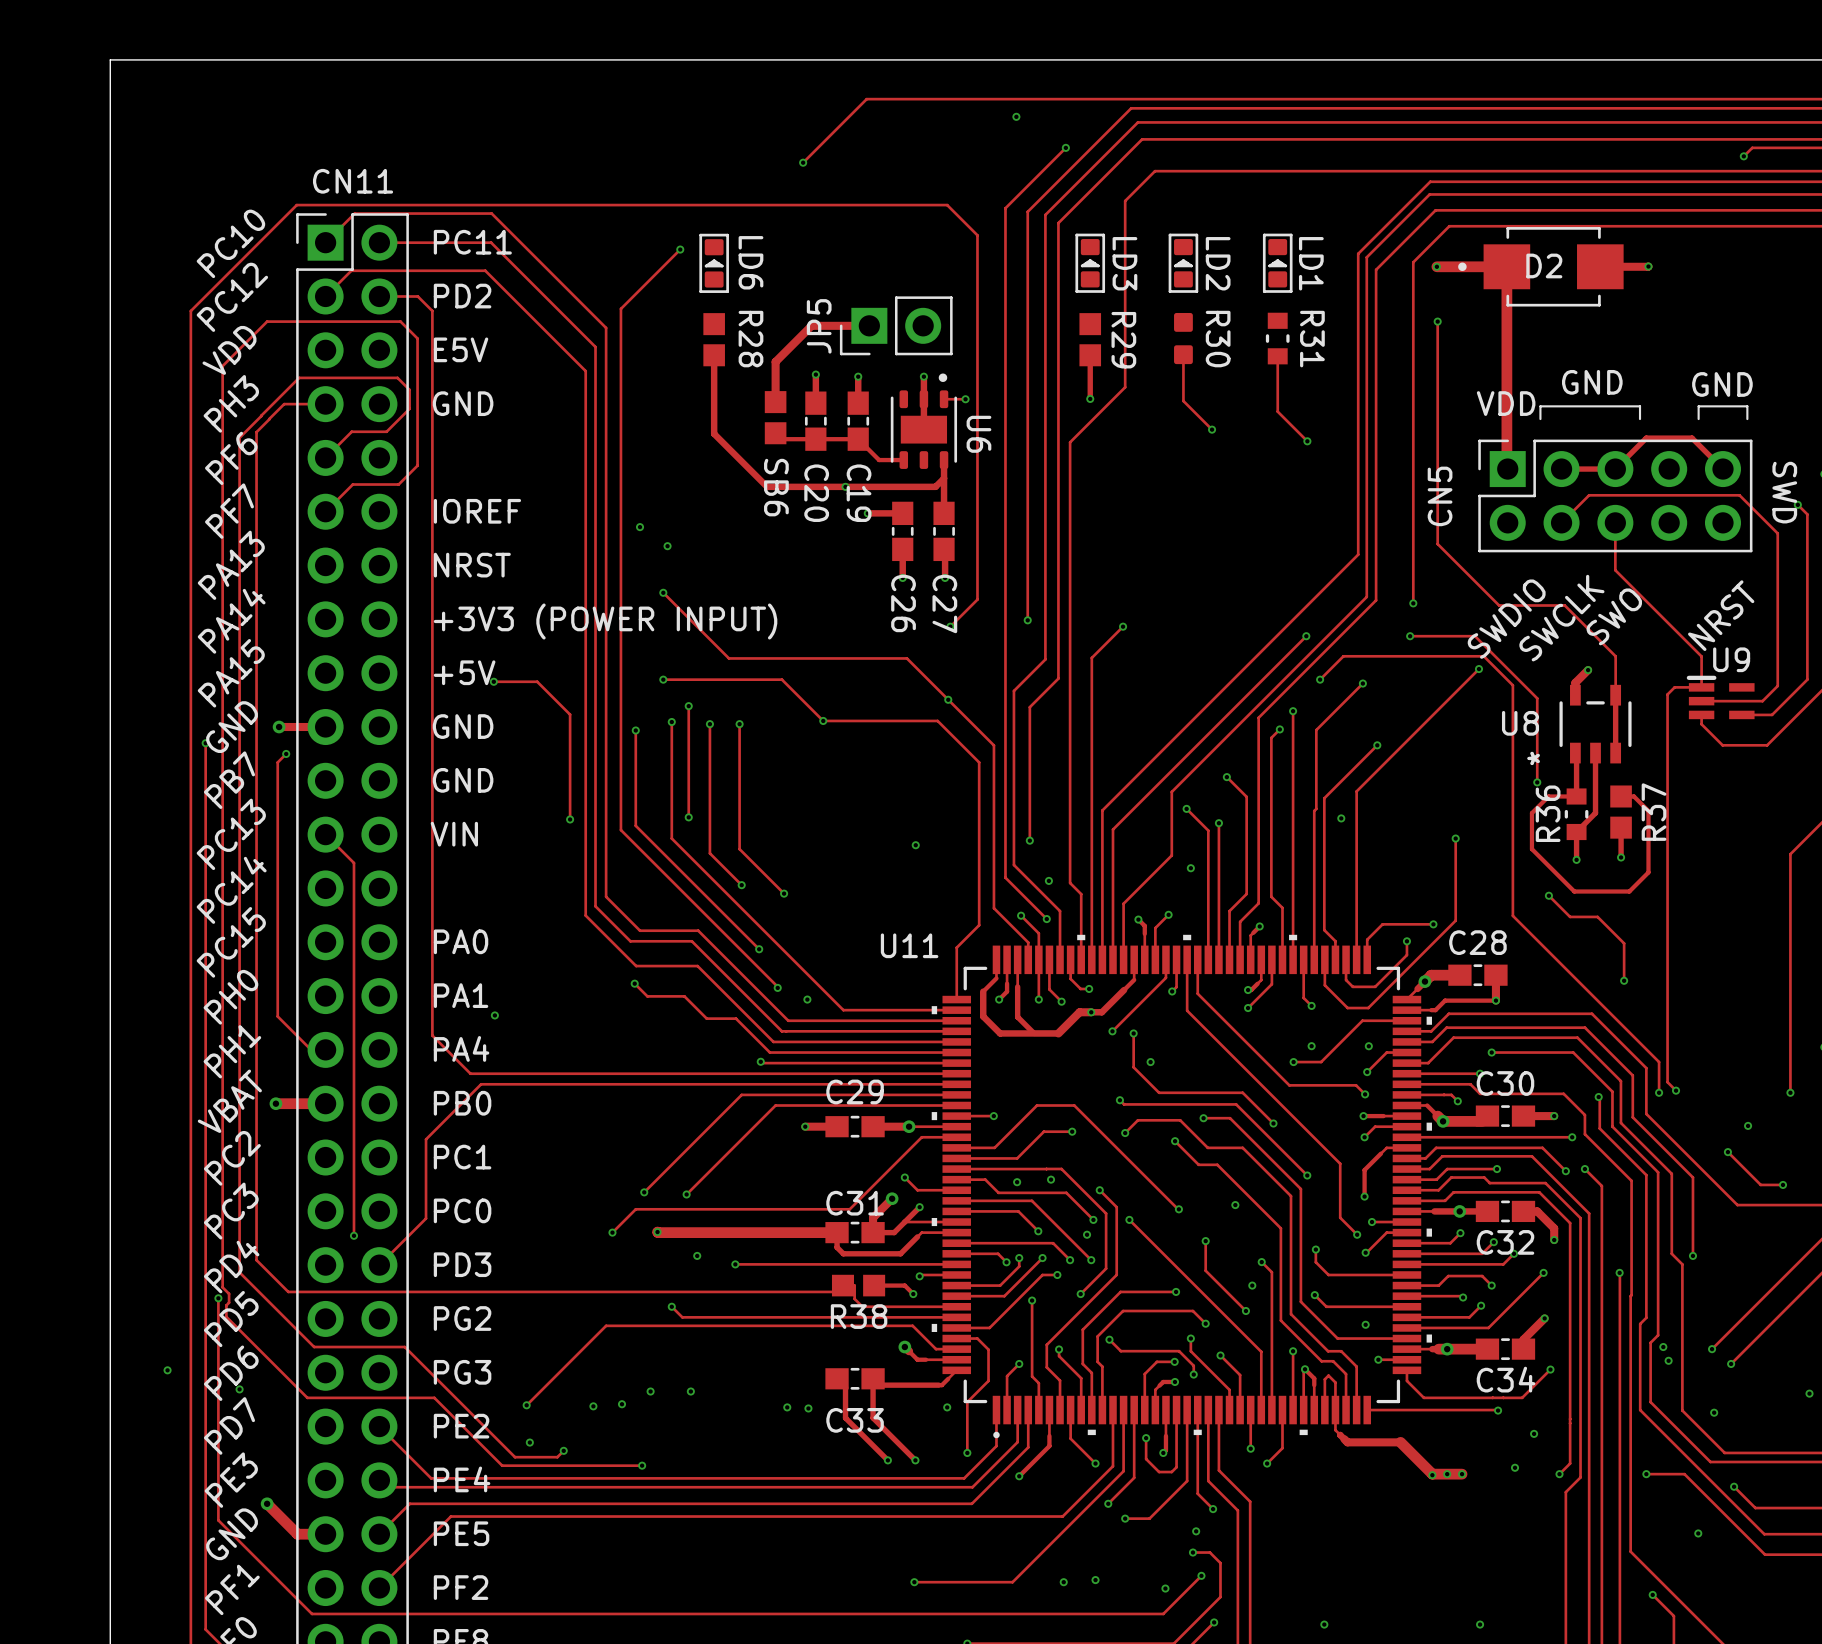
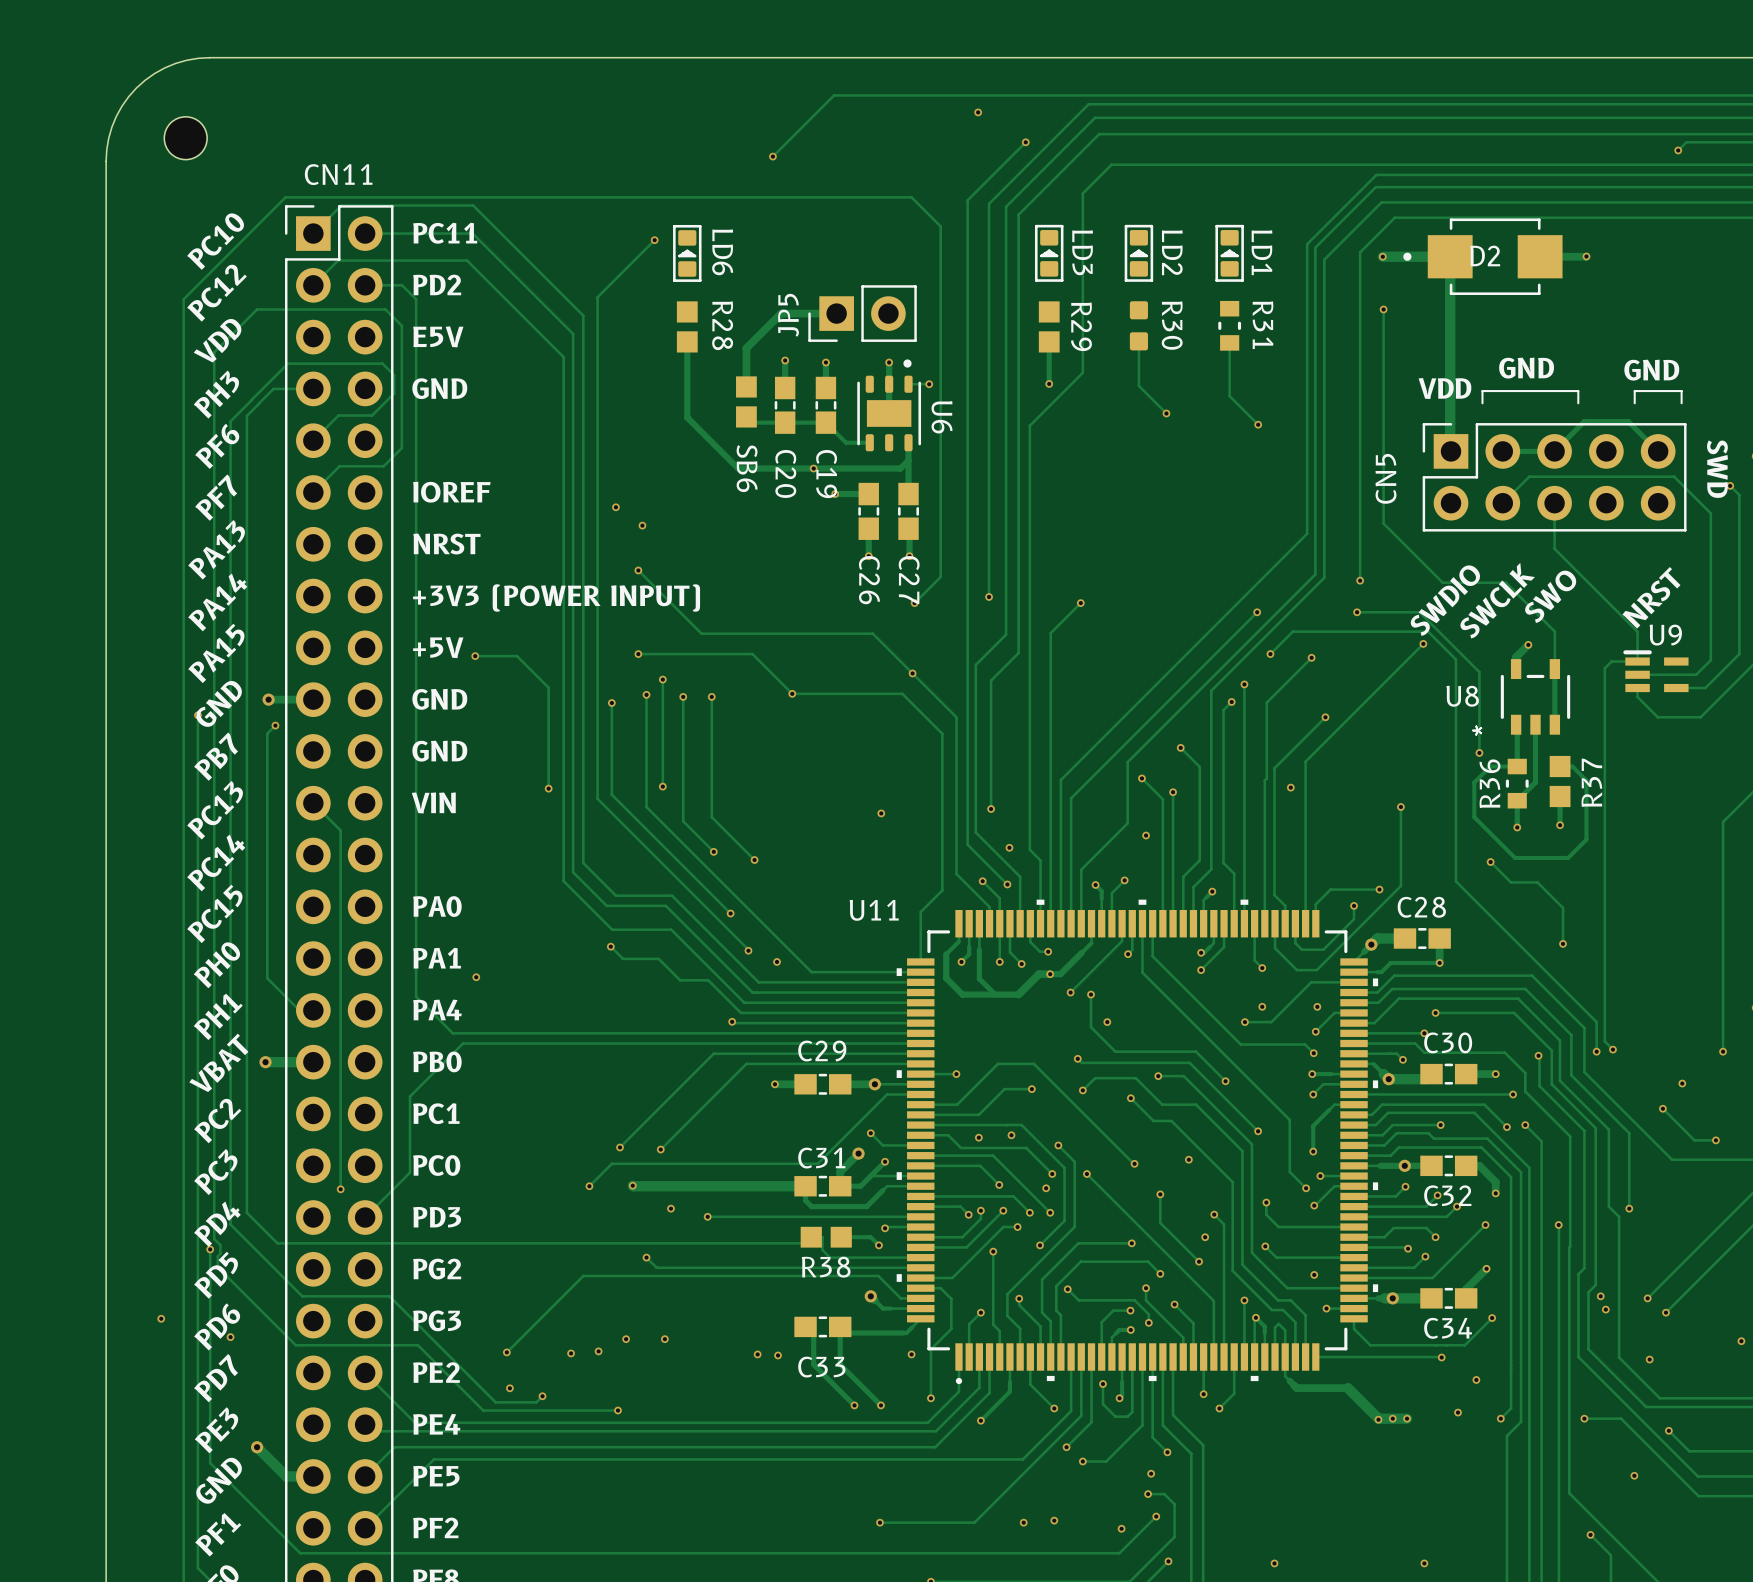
board edge: (217, 59) (110, 59) (110, 167) -> (209, 57) (175, 63) (154, 73) (136, 88) (116, 116) (108, 138) (106, 161)
part: none -> (185, 138)

